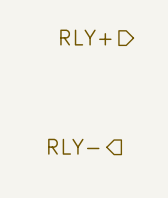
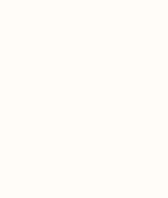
hierarchical label: RLY+ (85, 37) -> none
hierarchical label: RLY- (73, 146) -> none

